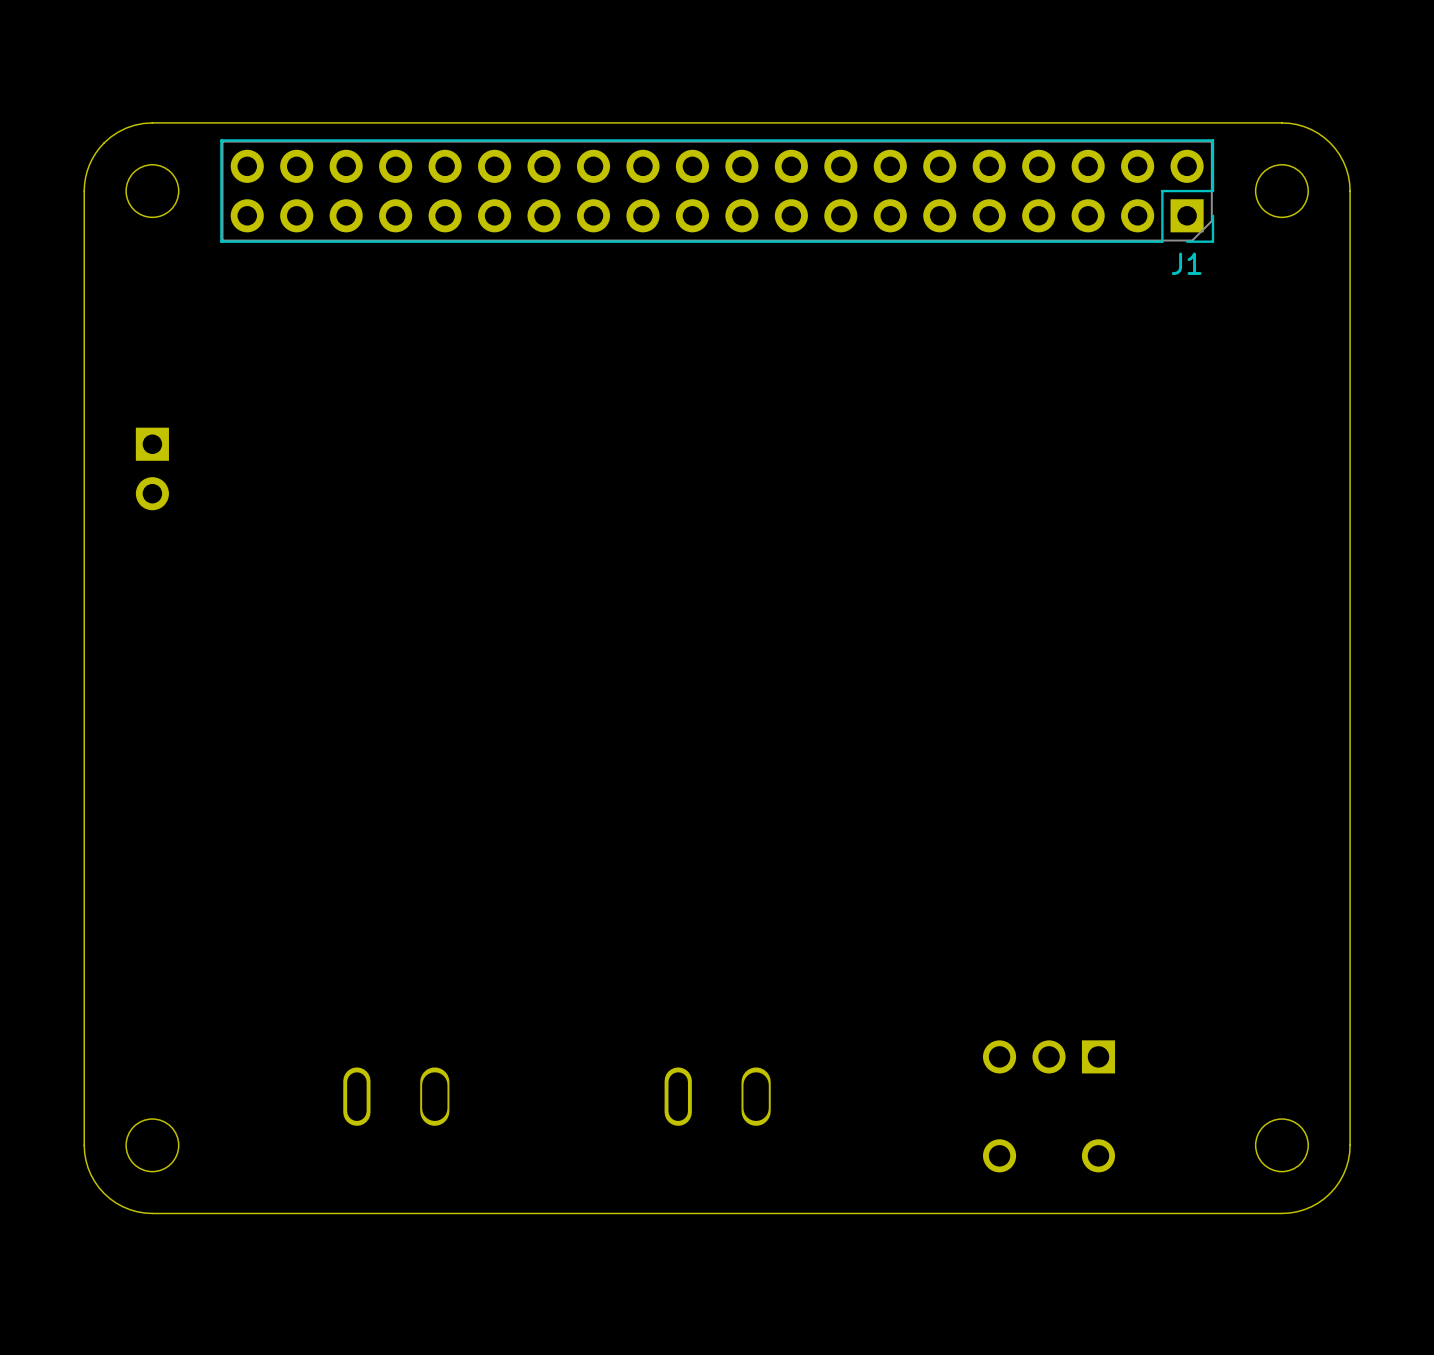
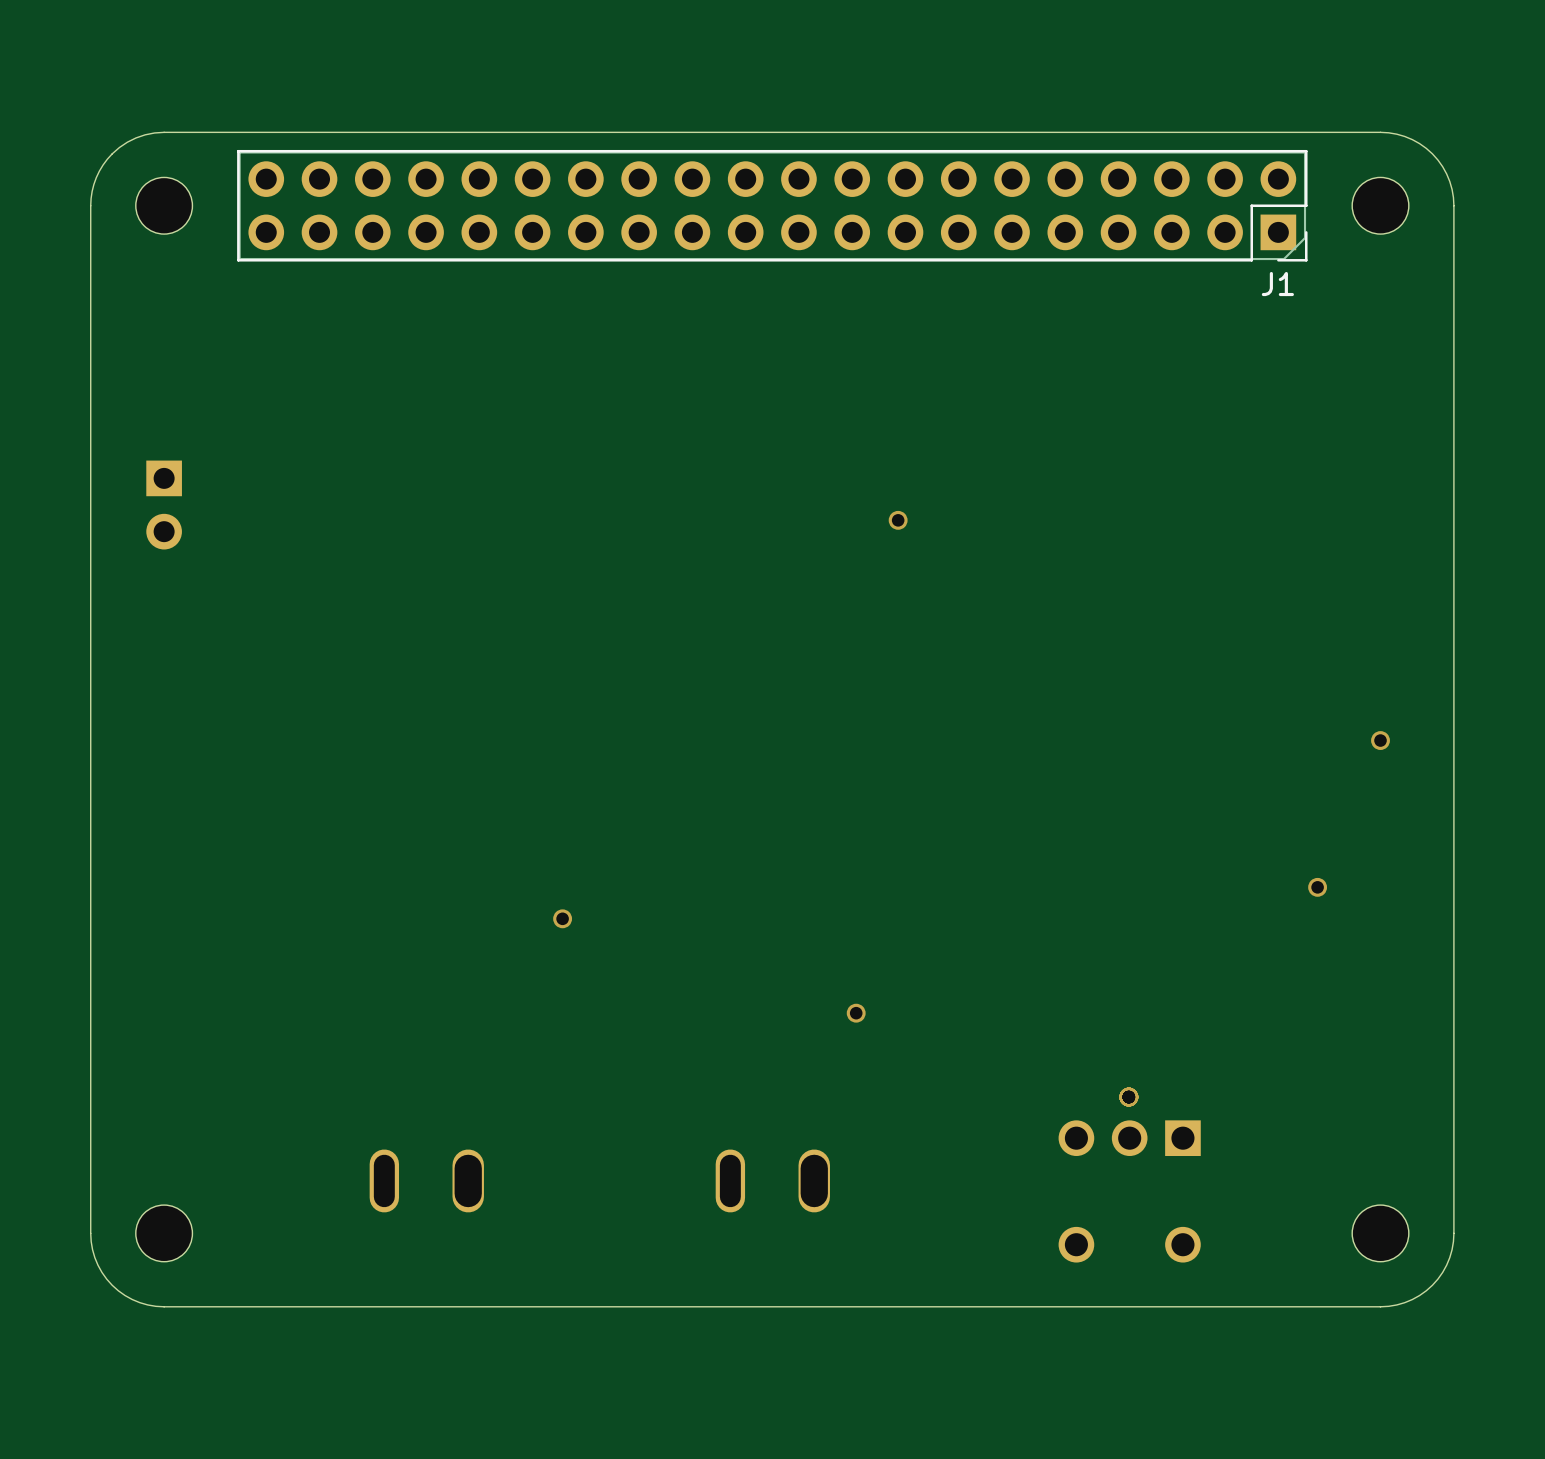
via: none -> (898, 520)
via: none -> (1380, 740)
via: none -> (1317, 887)
via: none -> (562, 918)
via: none -> (856, 1013)
via: none -> (1128, 1097)

